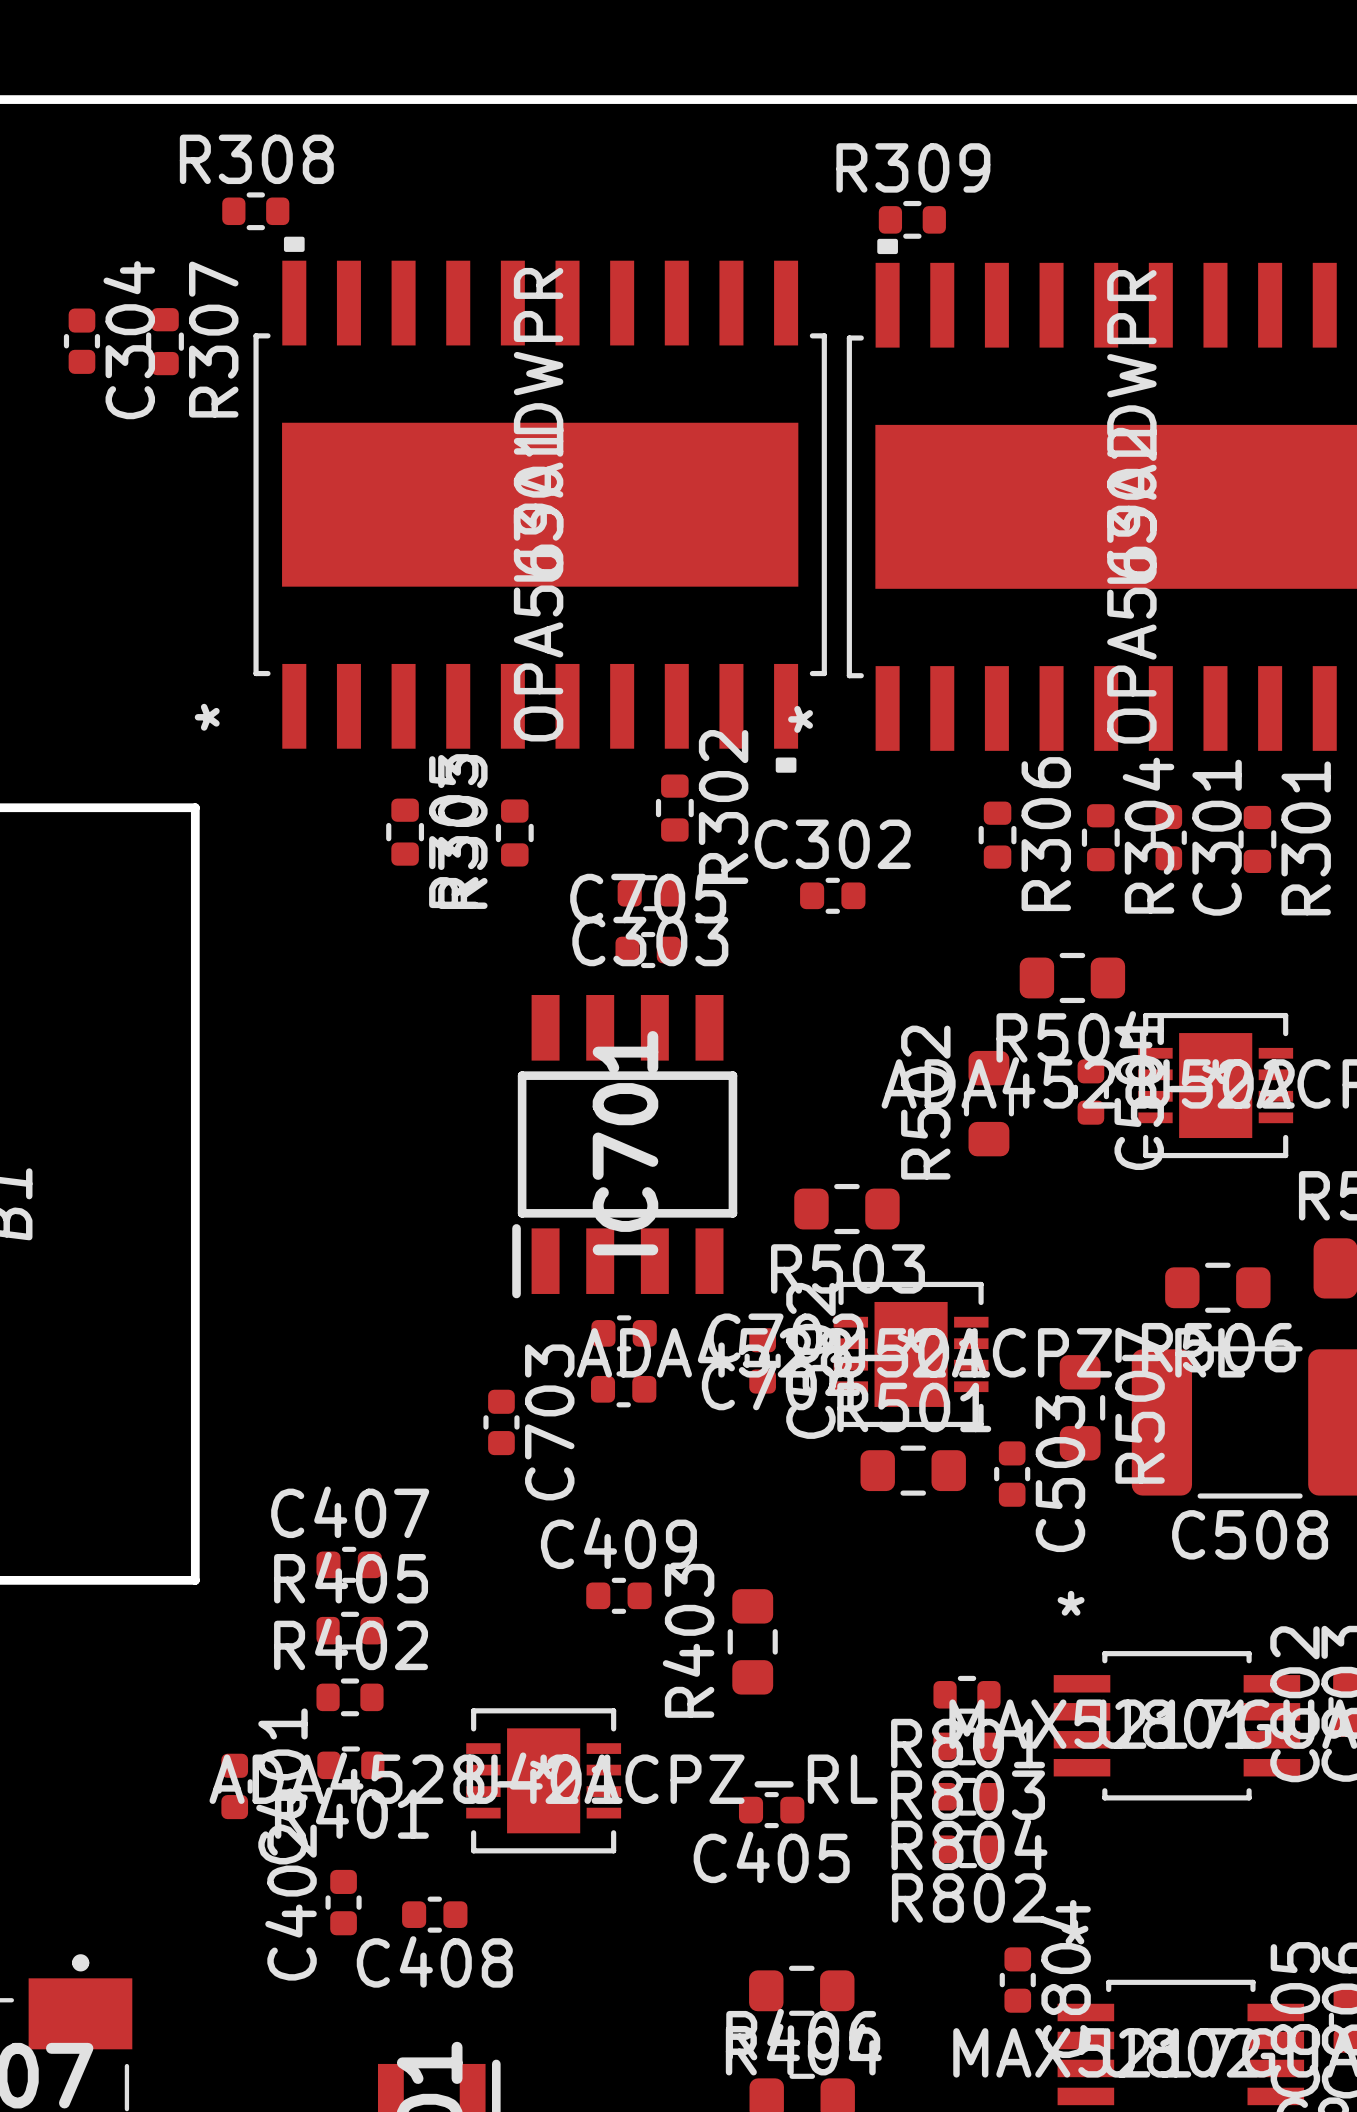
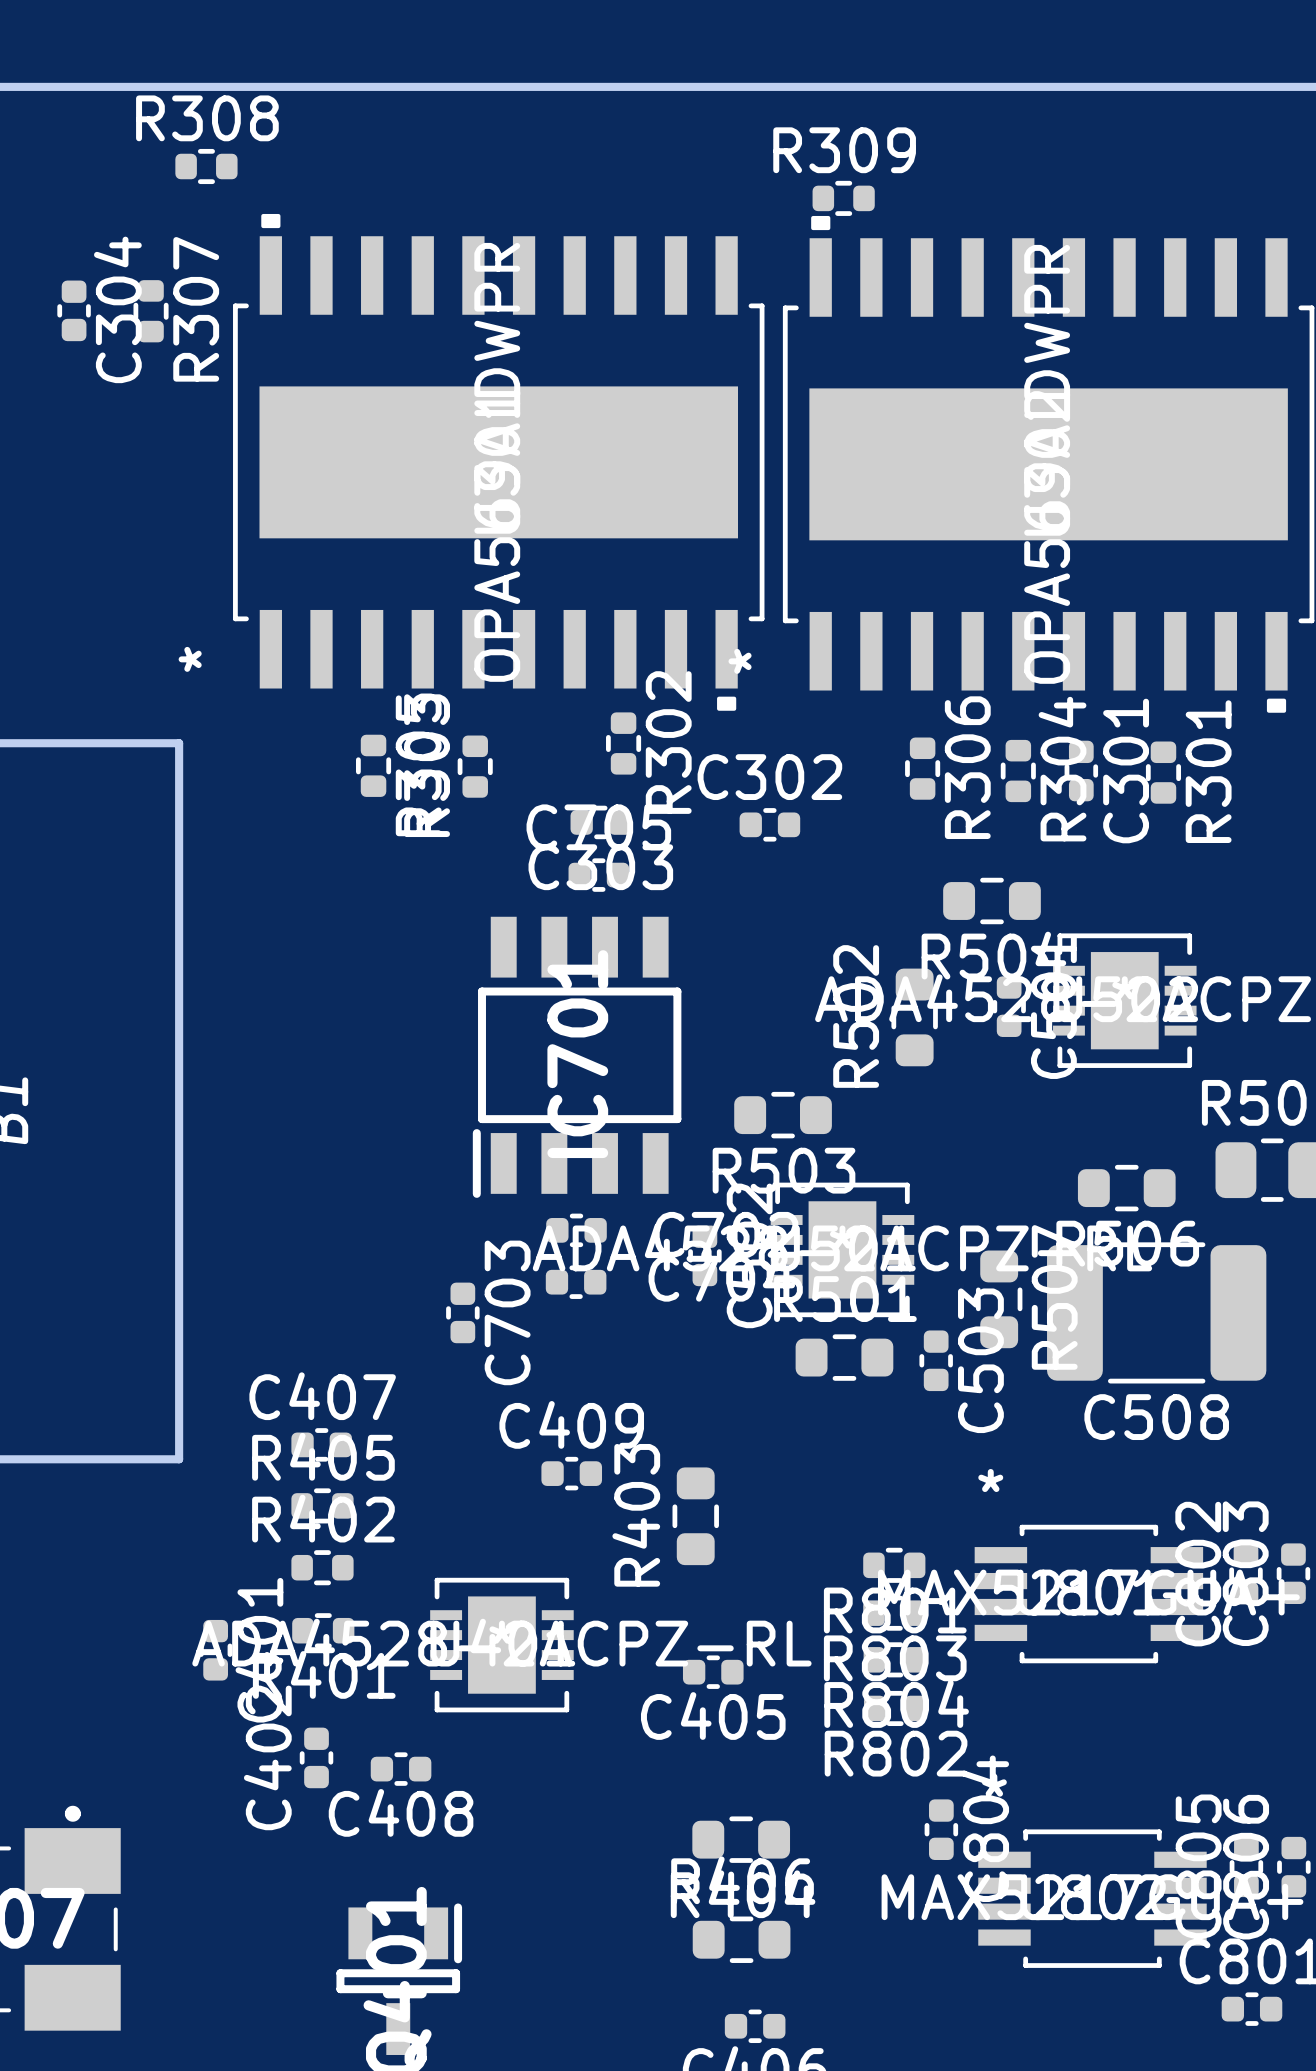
R308 position: (255, 211) -> (206, 166)

